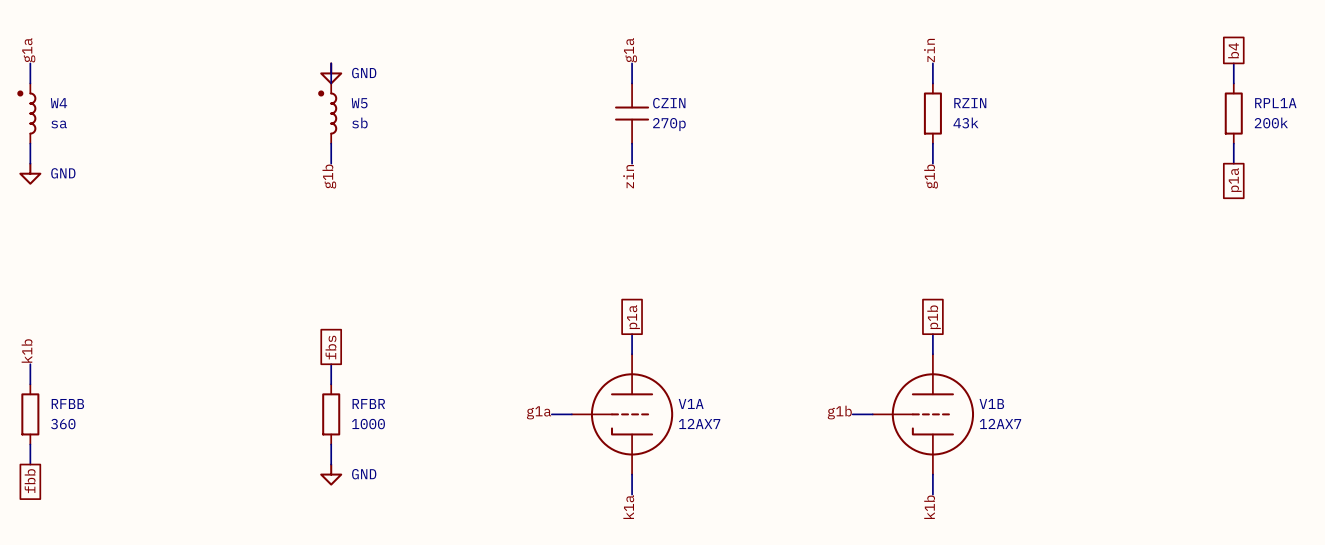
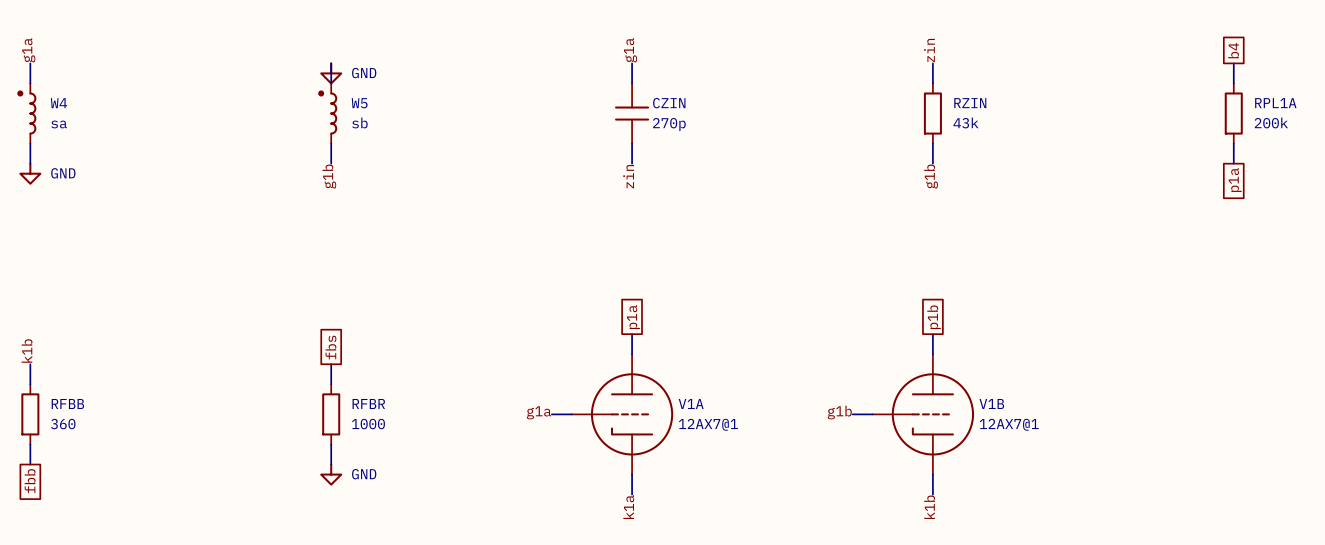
V1A value: 12AX7 (699, 423) -> 12AX7@1 (708, 424)
V1B value: 12AX7 (1000, 423) -> 12AX7@1 (1009, 424)

